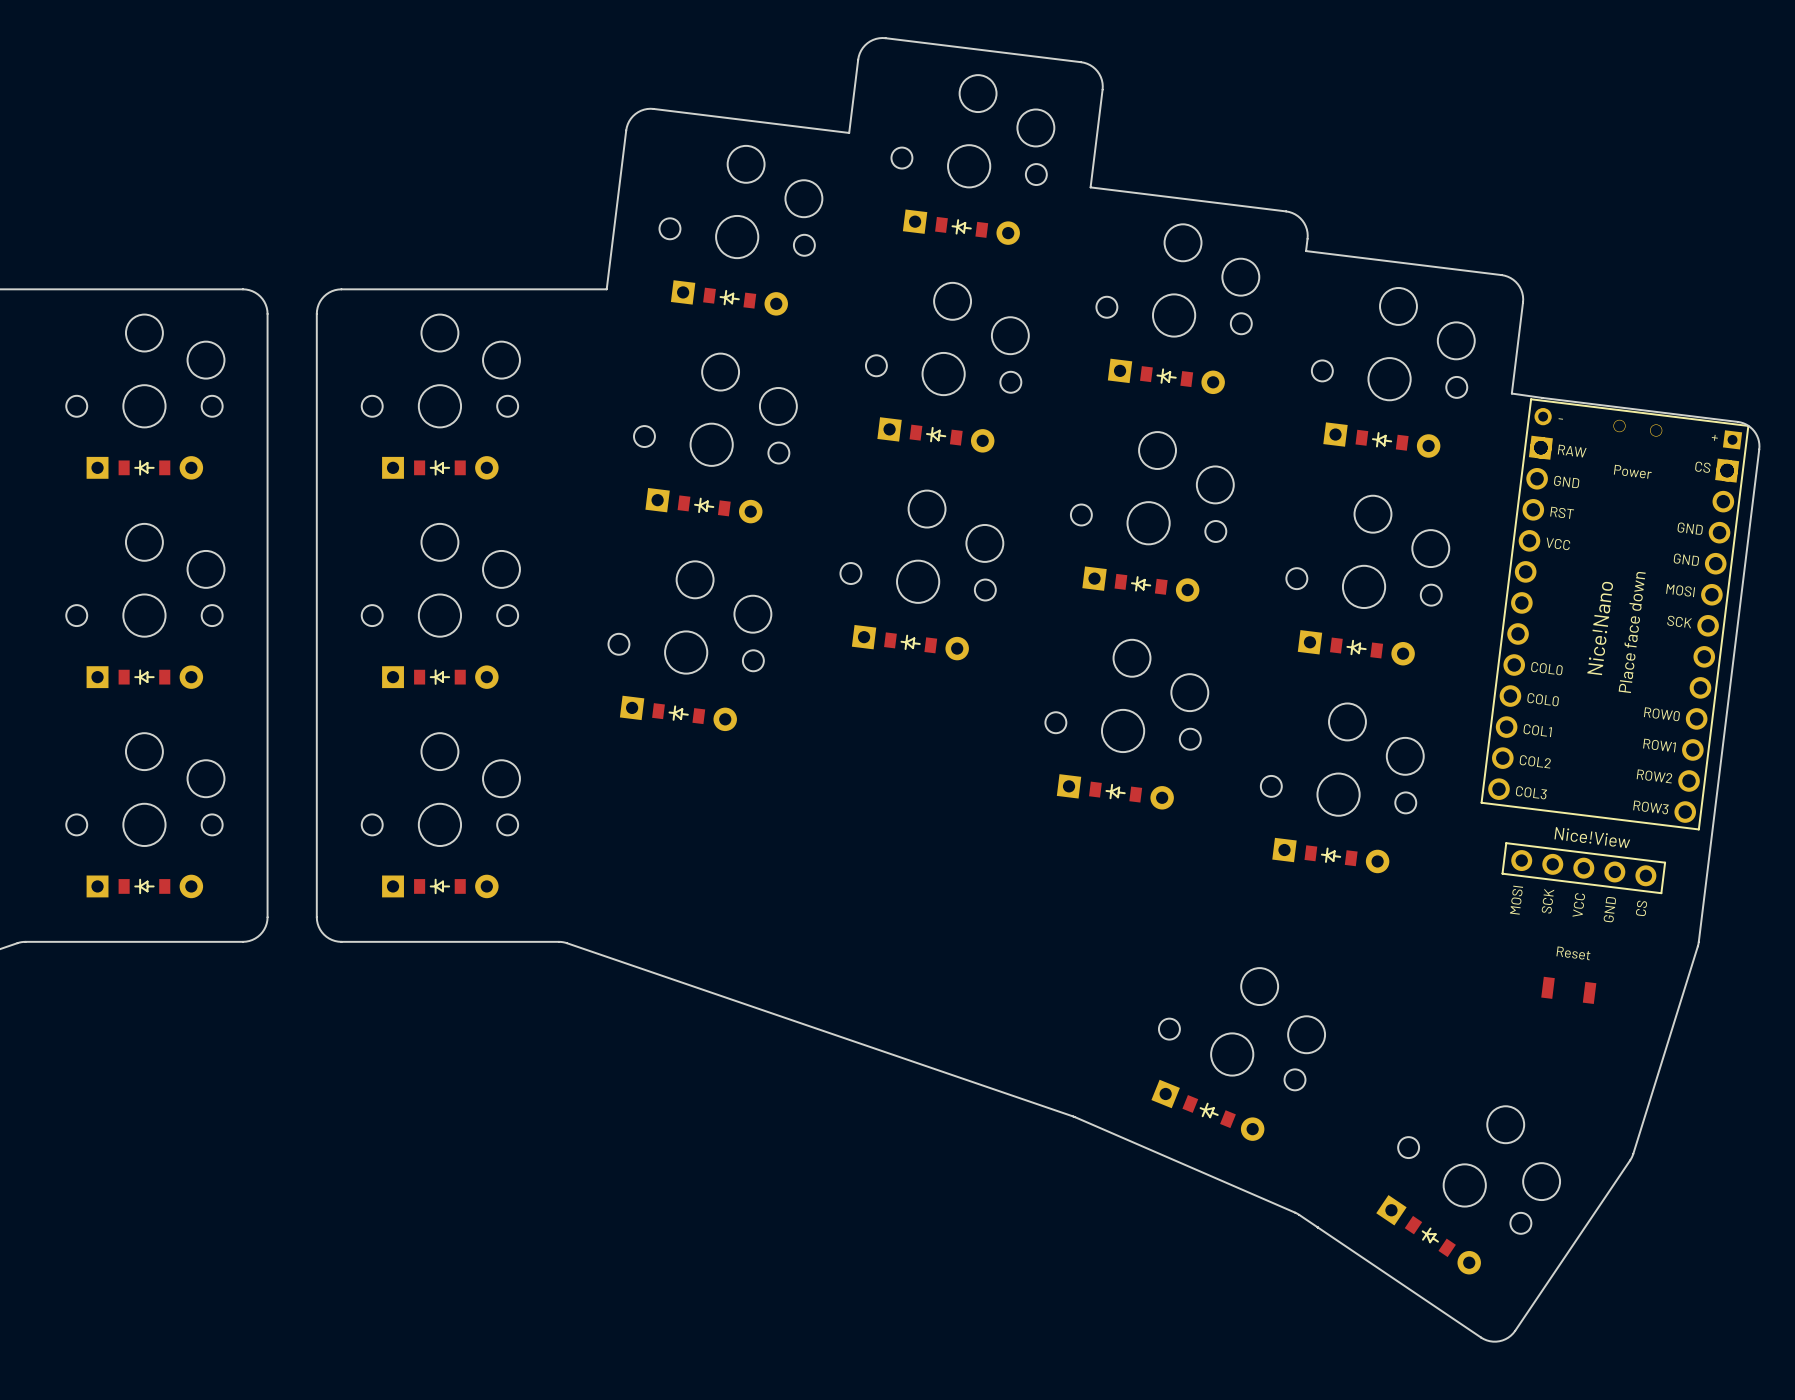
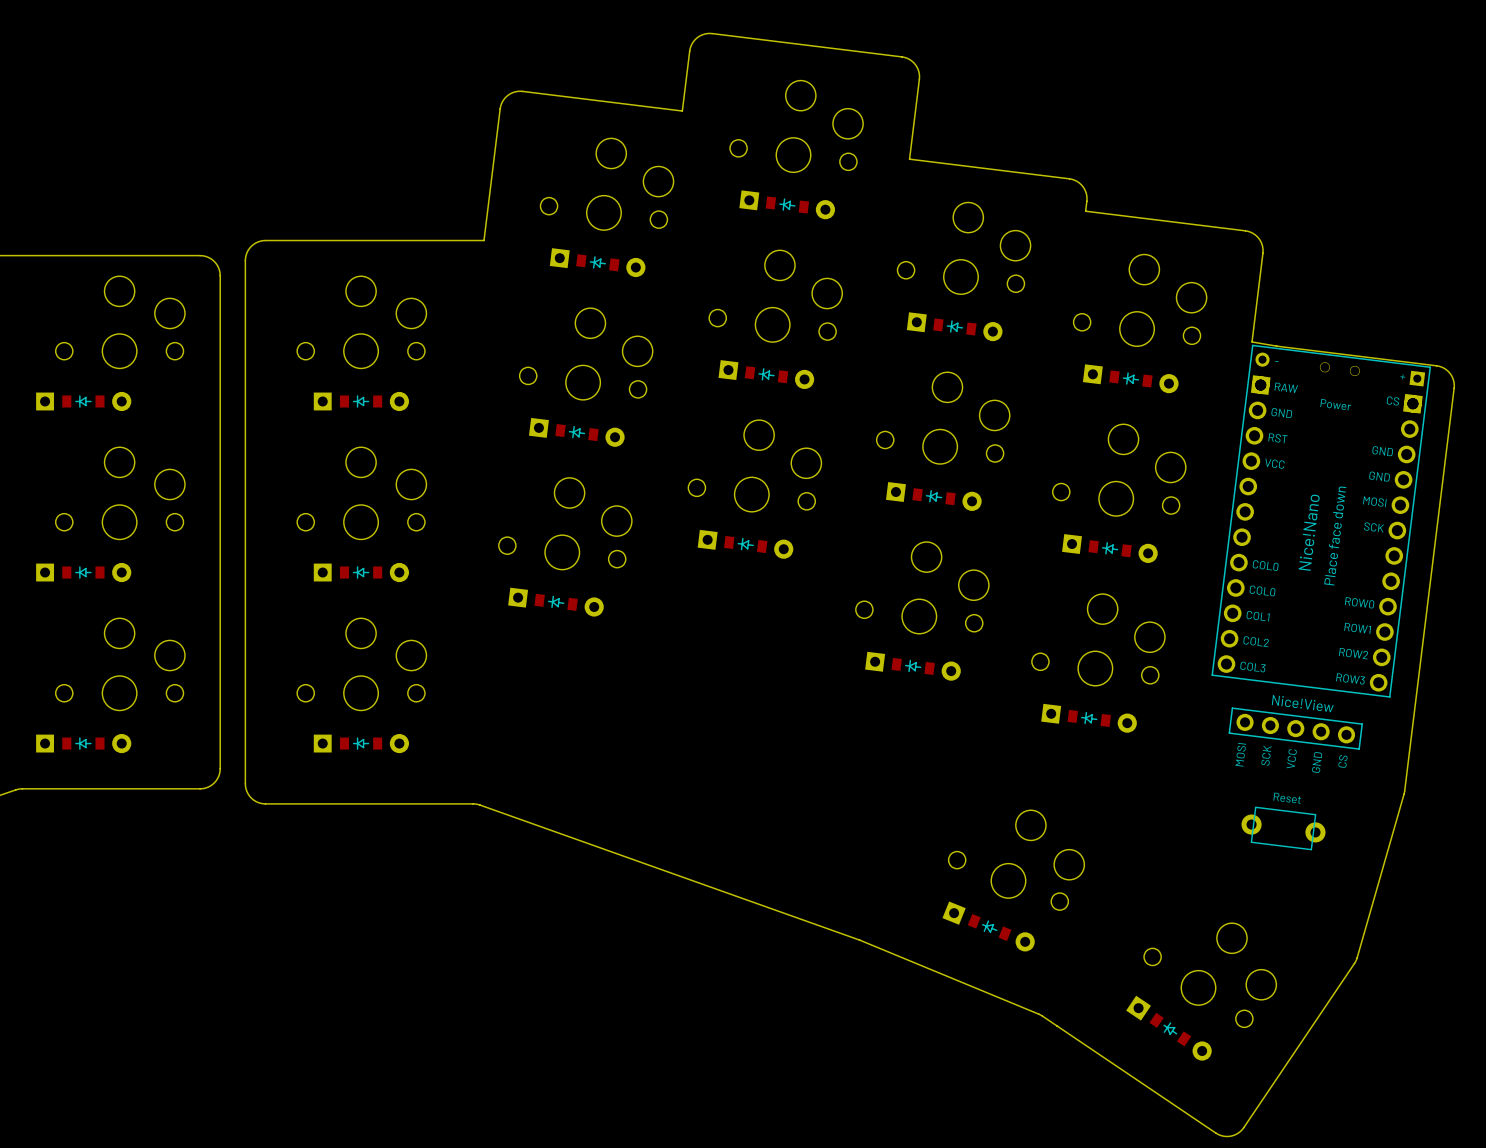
board edge: (1561, 400) (1511, 393) (1523, 299) (1519, 287) (1507, 276) (1306, 251) (1307, 235) (1305, 226) (1300, 218) (1289, 212) (1090, 187) (1102, 86) (1097, 71) (1084, 62) (879, 38) (867, 43) (858, 56) (849, 132) (653, 108) (641, 110) (631, 118) (626, 127) (606, 289) (341, 289) (329, 292) (318, 304) (316, 313) (316, 917) (318, 926) (326, 936) (341, 941) (564, 942) (1073, 1116) (1297, 1213) (1481, 1337) (1493, 1341) (1502, 1340) (1515, 1330) (1631, 1157) (1698, 944) (1759, 449) (1758, 438) (1754, 431) (1748, 425) (1737, 421) -> (1277, 346) (1252, 341) (1263, 250) (1260, 240) (1252, 233) (1085, 211) (1087, 198) (1085, 190) (1080, 184) (1071, 179) (909, 159) (919, 76) (916, 66) (906, 58) (706, 33) (697, 37) (690, 48) (682, 111) (522, 91) (512, 92) (504, 99) (500, 106) (484, 240) (265, 240) (255, 243) (246, 252) (245, 260) (245, 783) (246, 791) (253, 799) (265, 803) (480, 805) (859, 940) (1038, 1014) (1215, 1133) (1225, 1136) (1233, 1135) (1243, 1127) (1356, 960) (1404, 792) (1454, 385) (1452, 377) (1445, 368) (1421, 363)
part position: (144, 467) -> (83, 401)
part position: (144, 677) -> (83, 572)
part position: (144, 886) -> (83, 743)
part footprint: [1541, 976, 1597, 1004] -> [1241, 806, 1326, 851]

